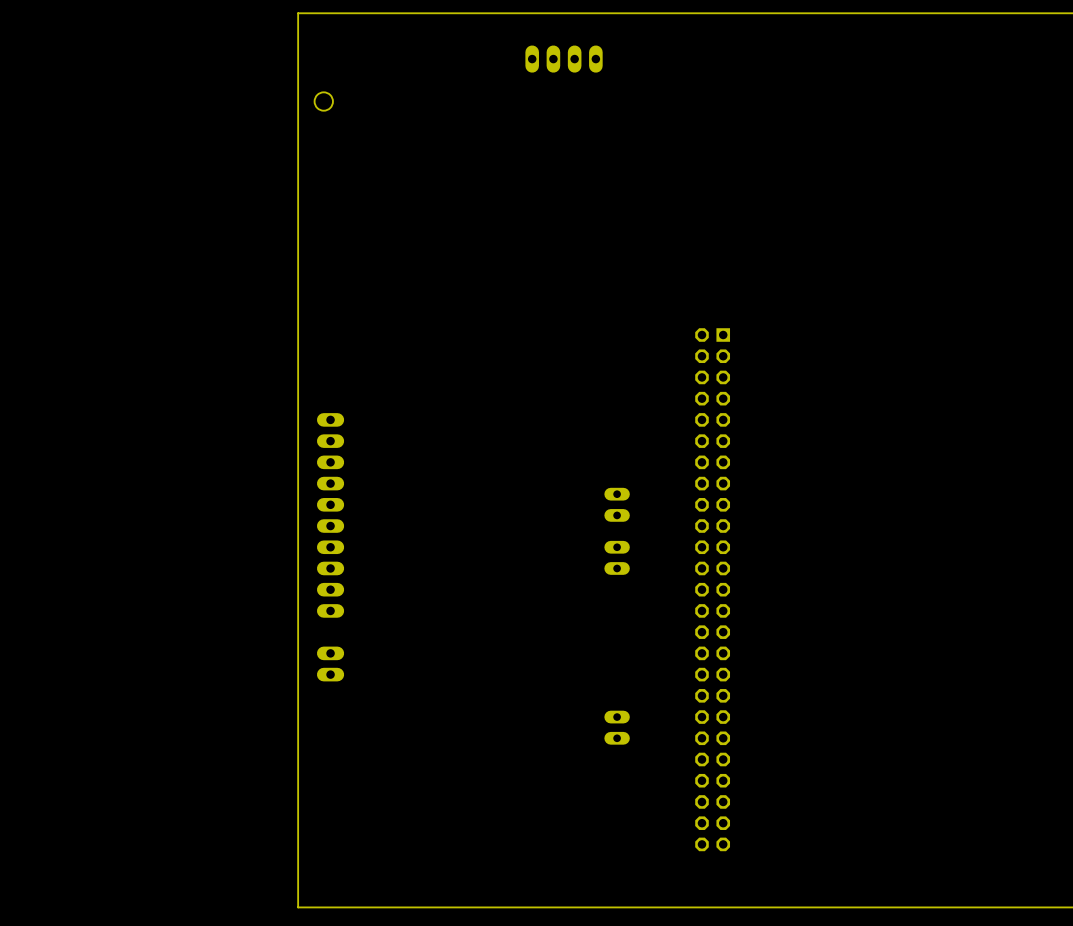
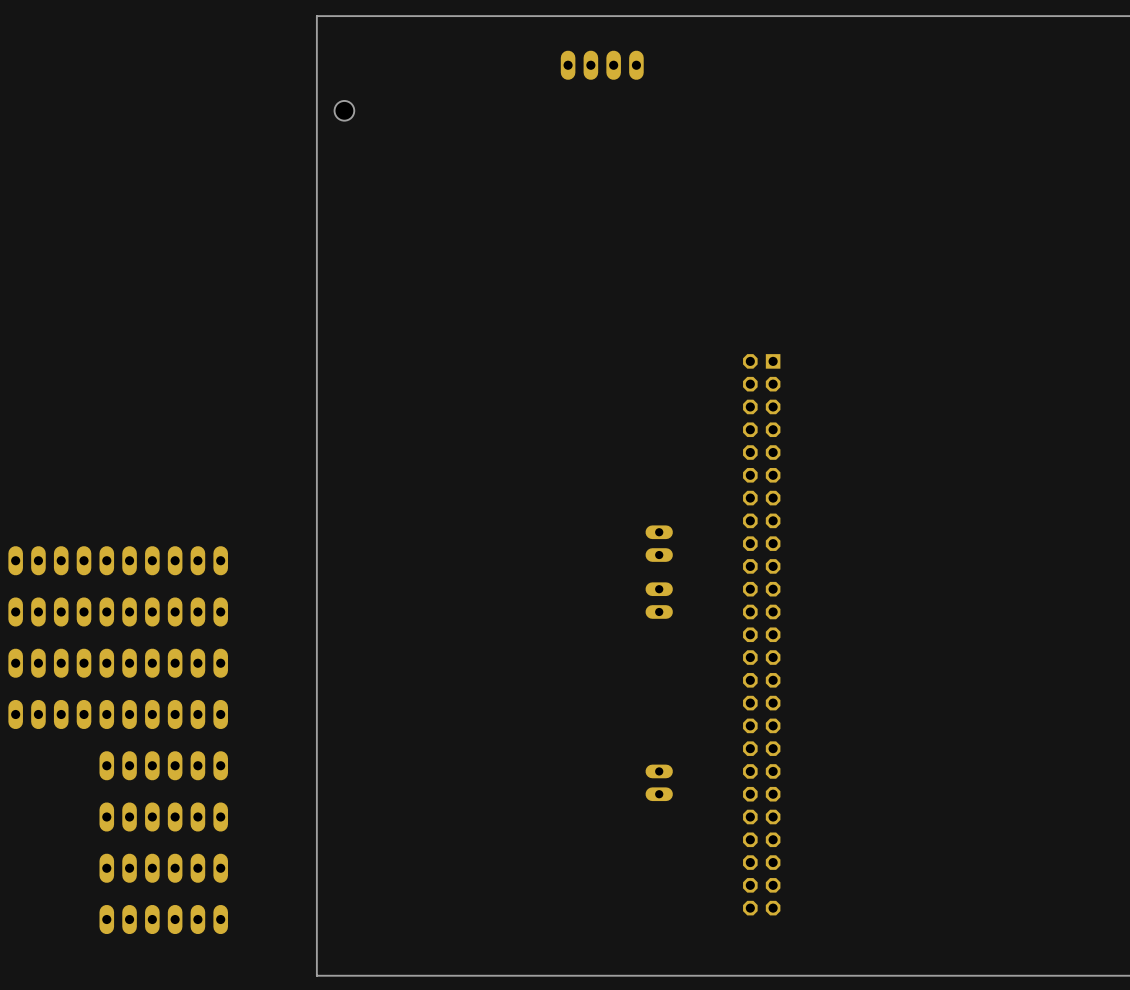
part: (330, 515) -> none
part: none -> (118, 560)
part: none -> (118, 611)
part: none -> (118, 663)
part: none -> (118, 714)
part: (330, 663) -> none
part: none -> (163, 765)
part: none -> (163, 817)
part: none -> (163, 868)
part: none -> (163, 919)

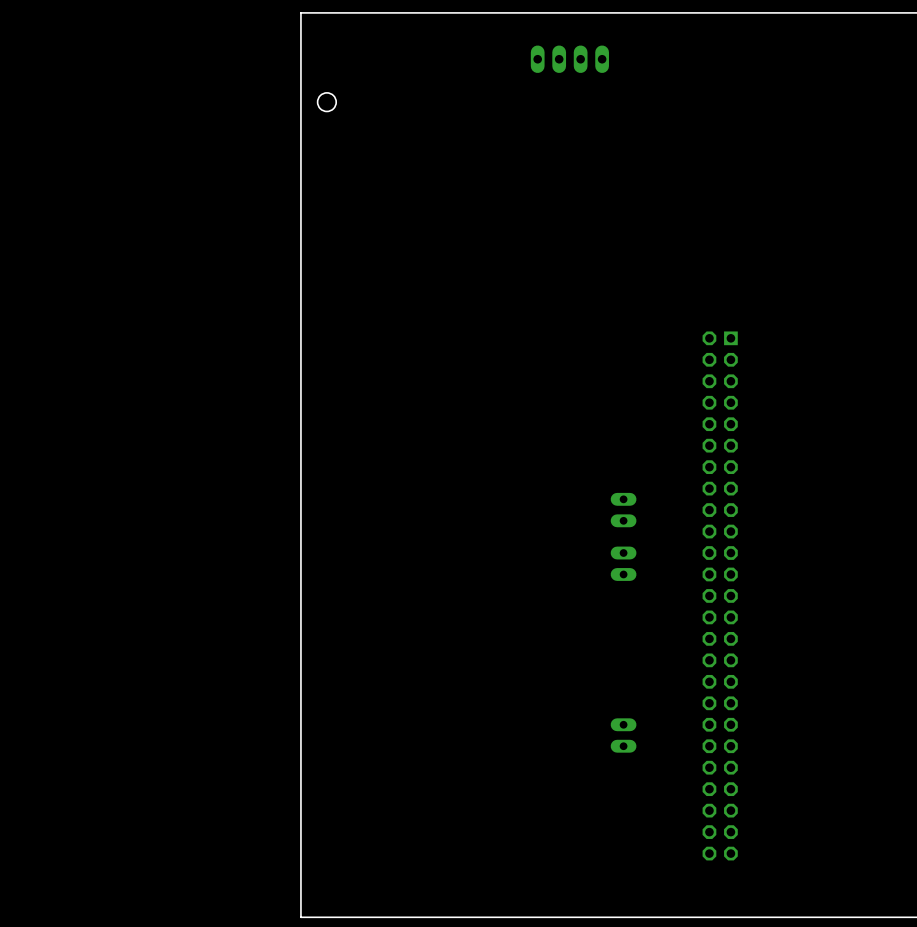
part: (118, 560) -> none
part: (118, 611) -> none
part: (118, 663) -> none
part: (118, 714) -> none
part: (163, 765) -> none
part: (163, 817) -> none
part: (163, 868) -> none
part: (163, 919) -> none

